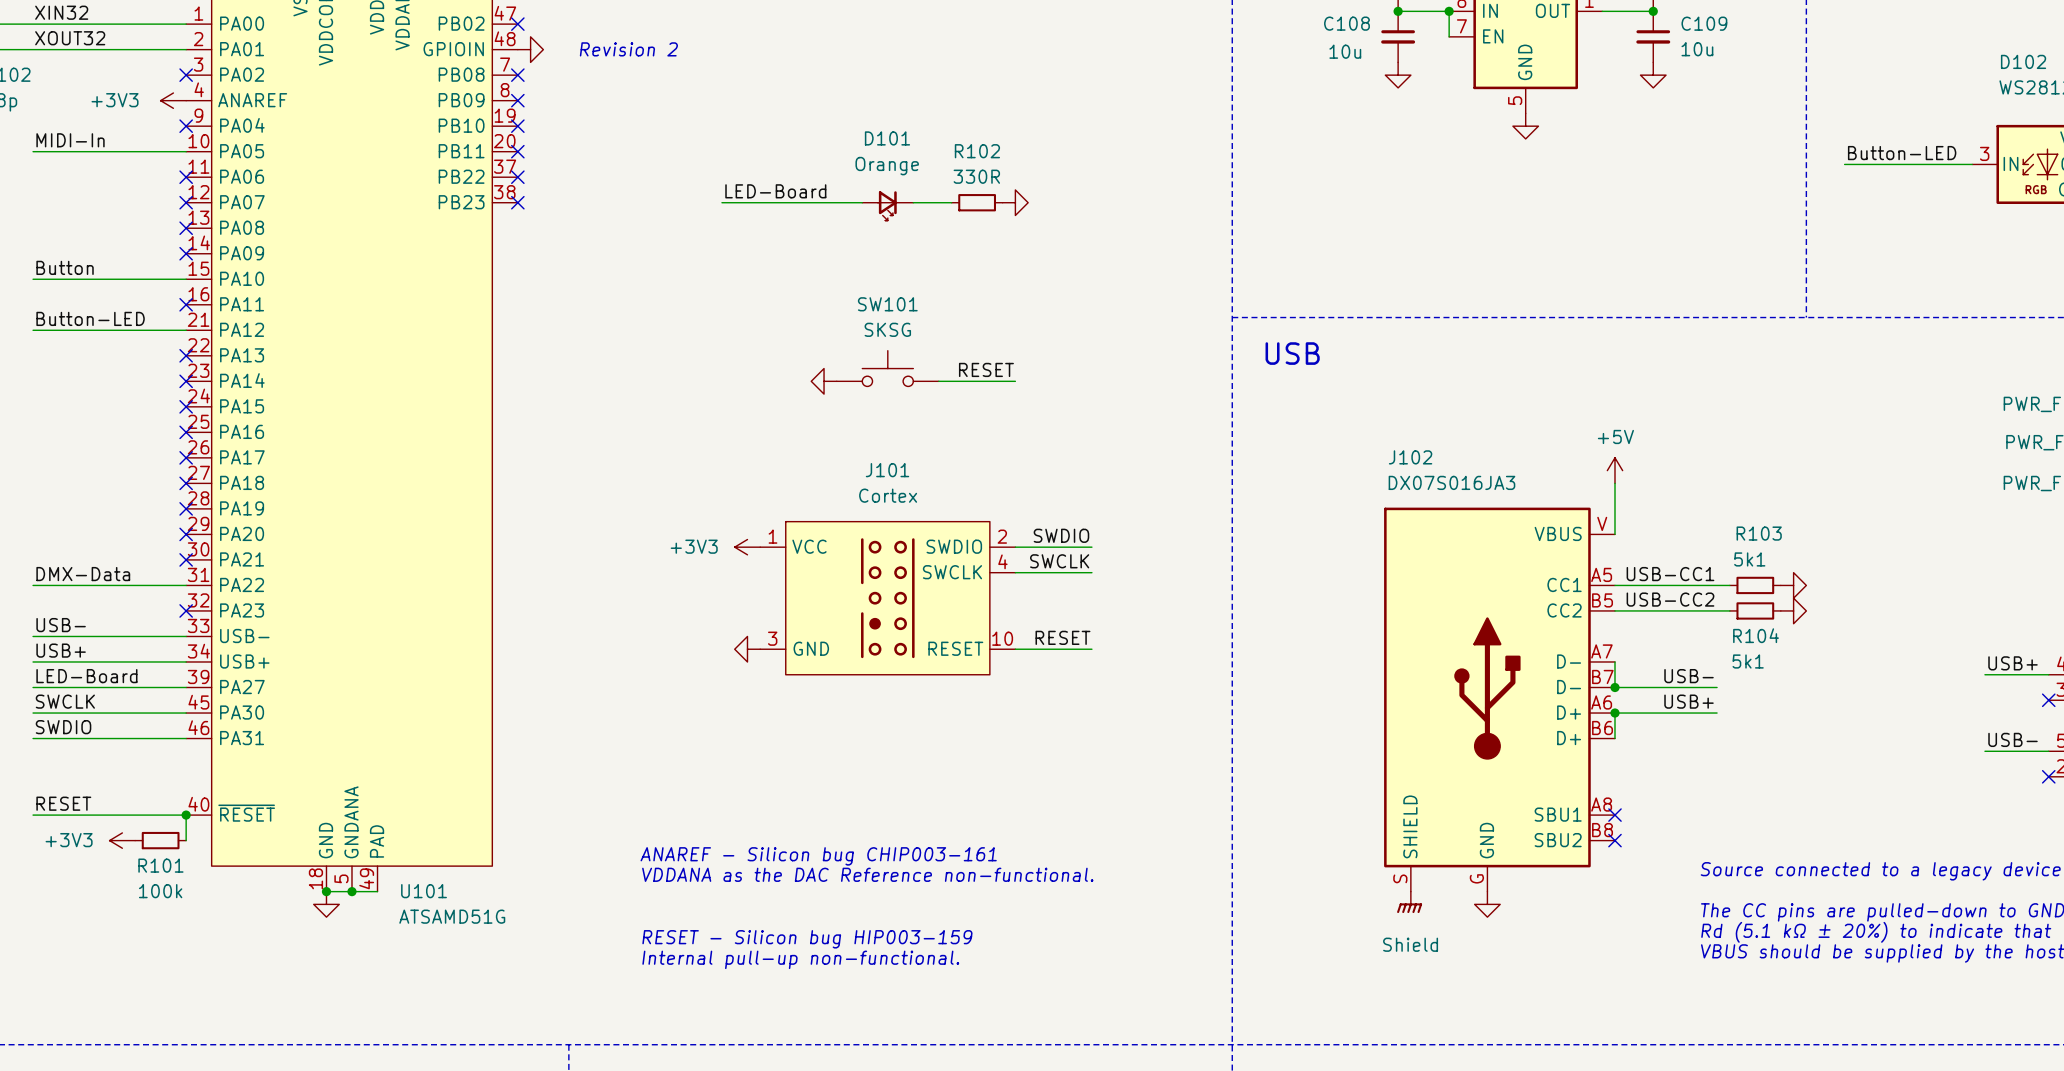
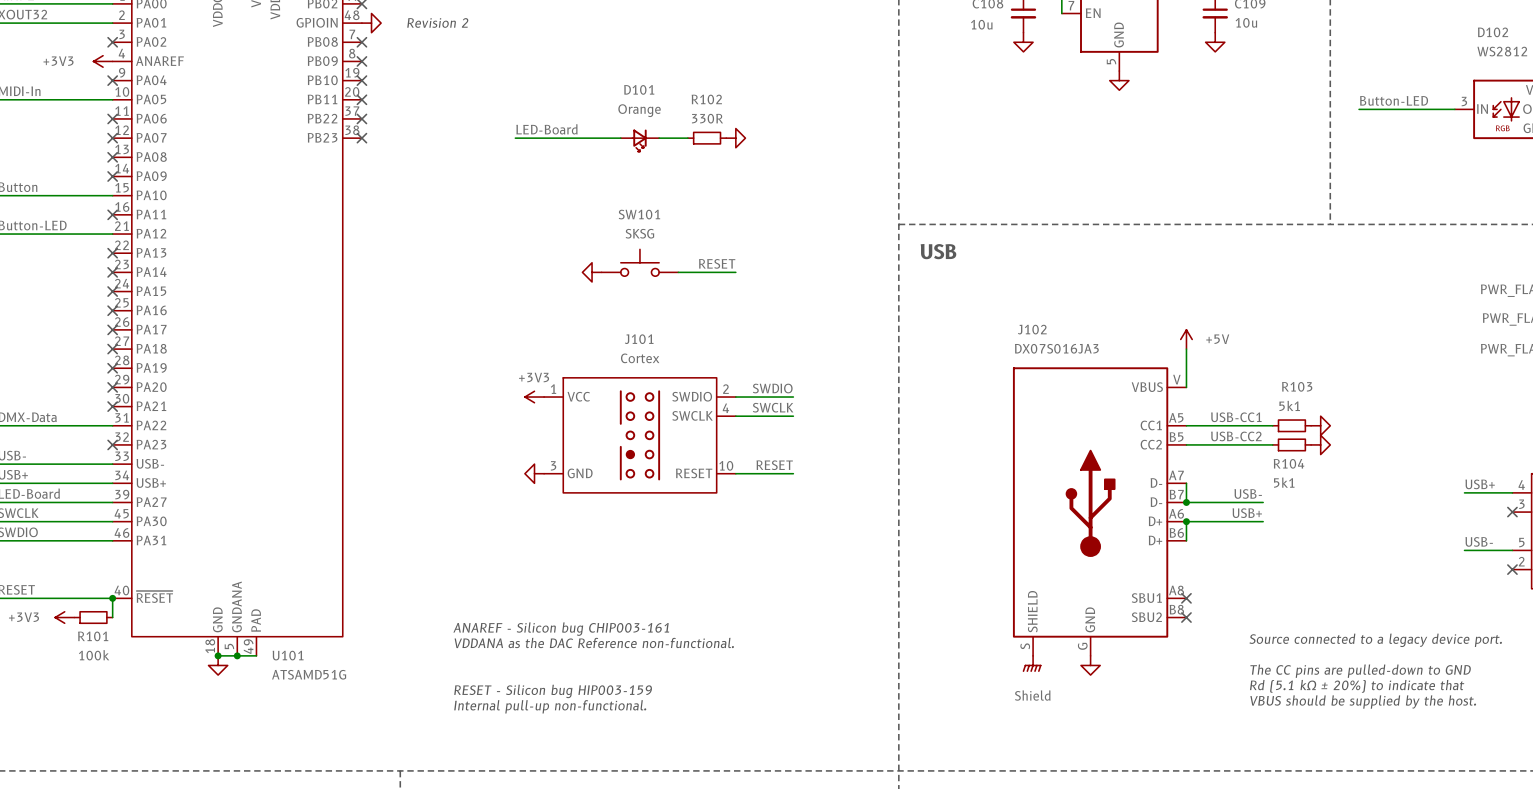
power symbol text position: +5V (1615, 436) -> +5V (1217, 339)
power symbol text position: +3V3 (694, 546) -> +3V3 (534, 377)

